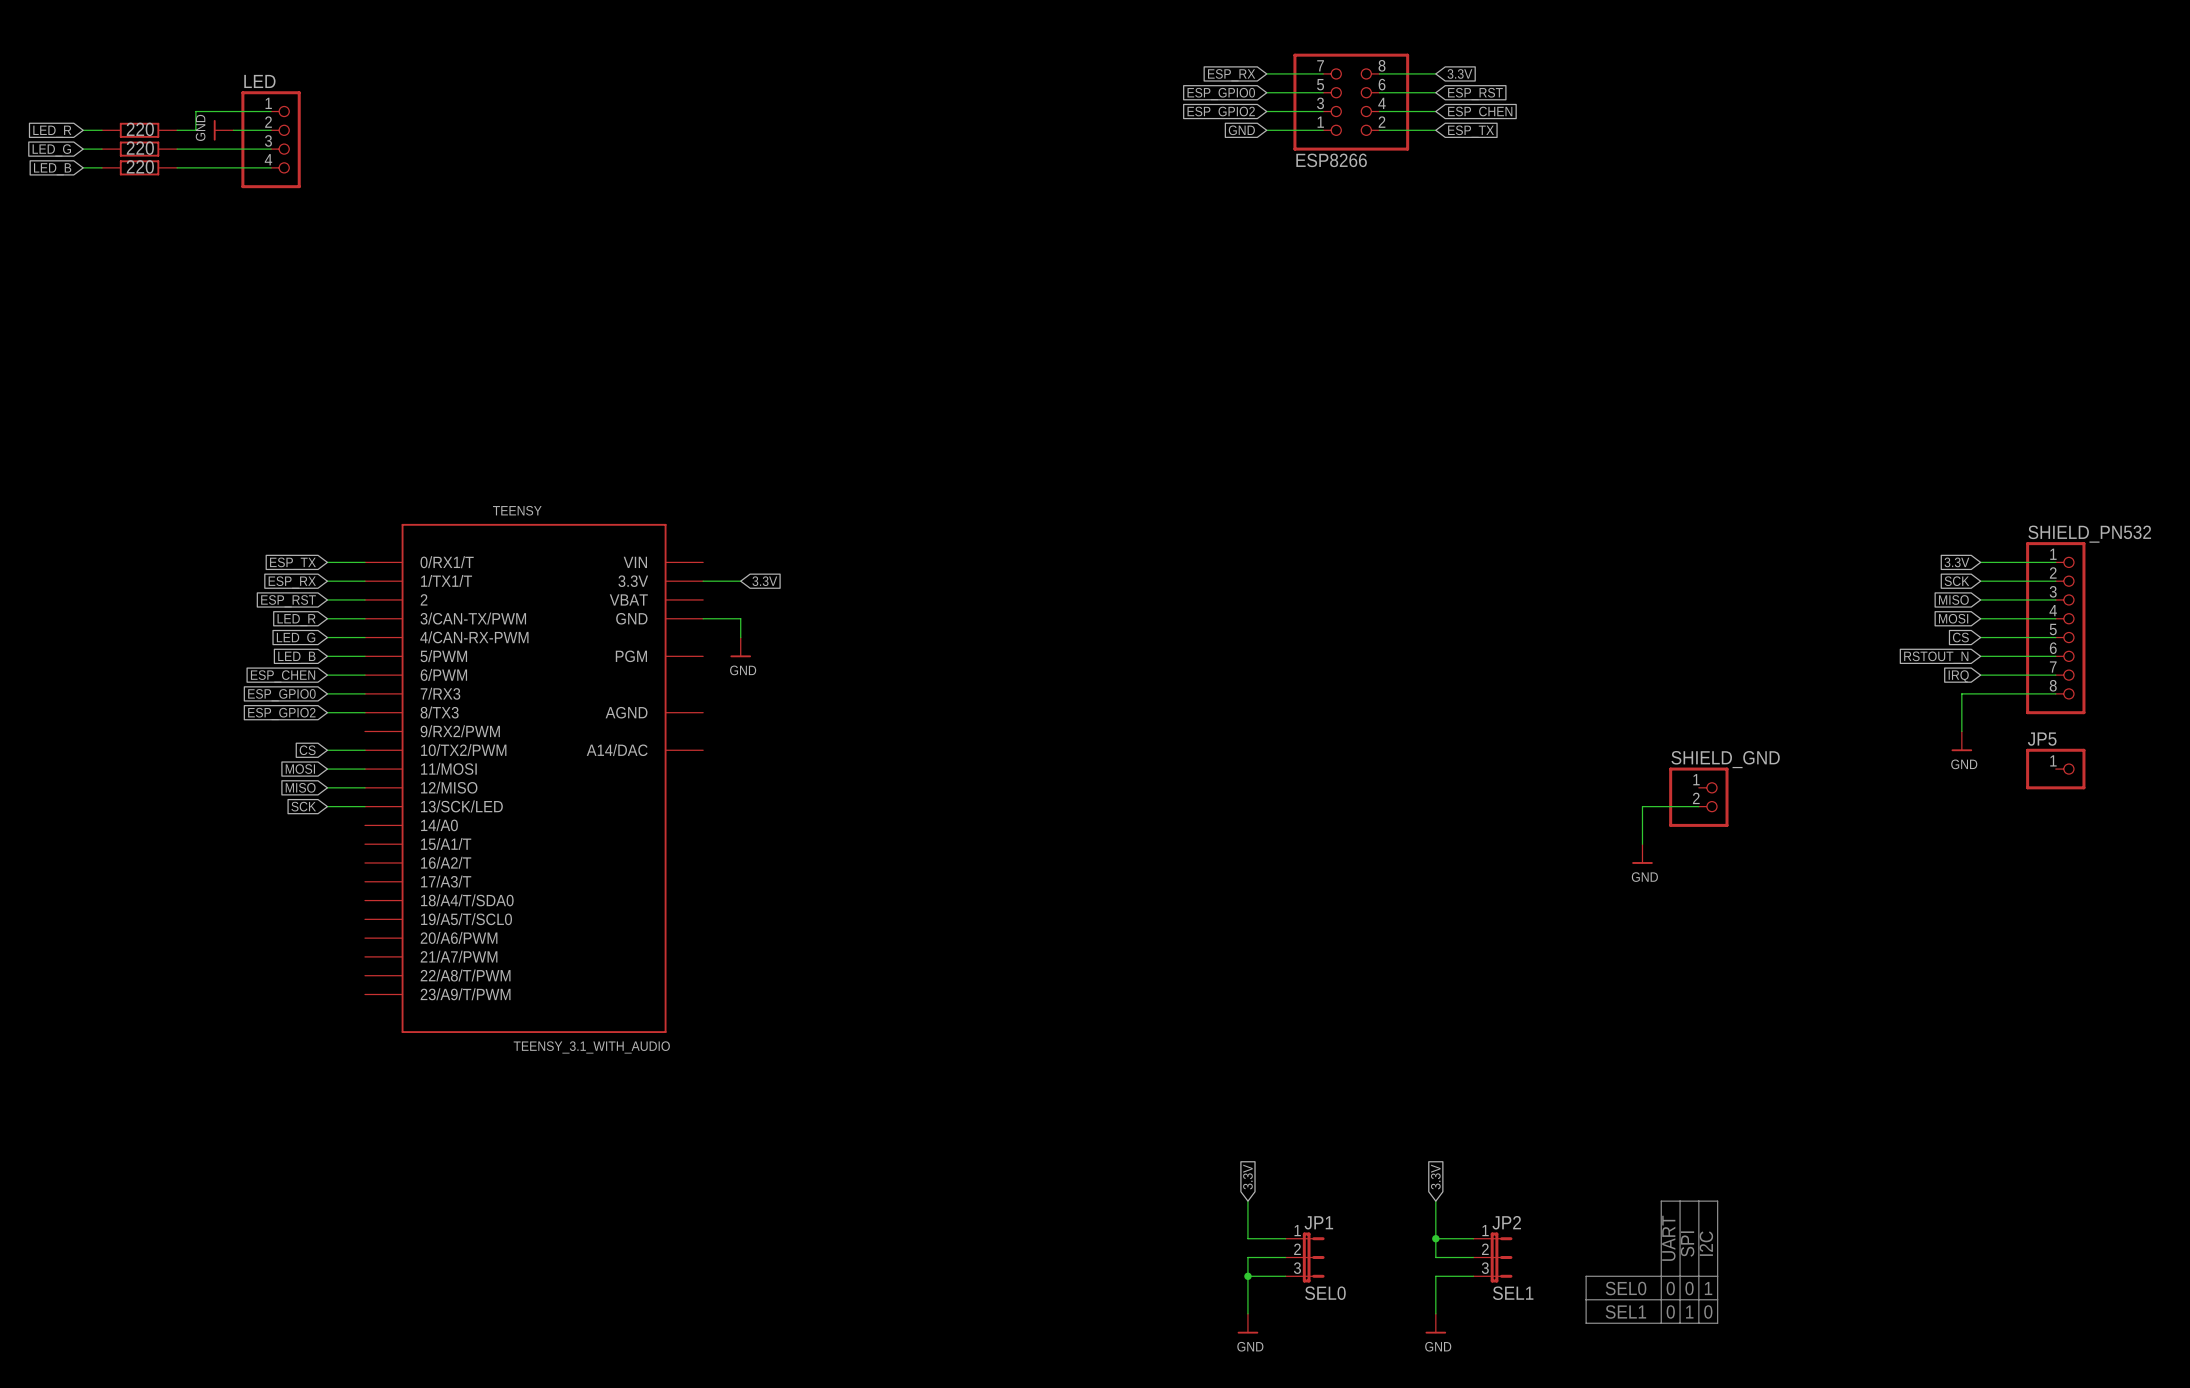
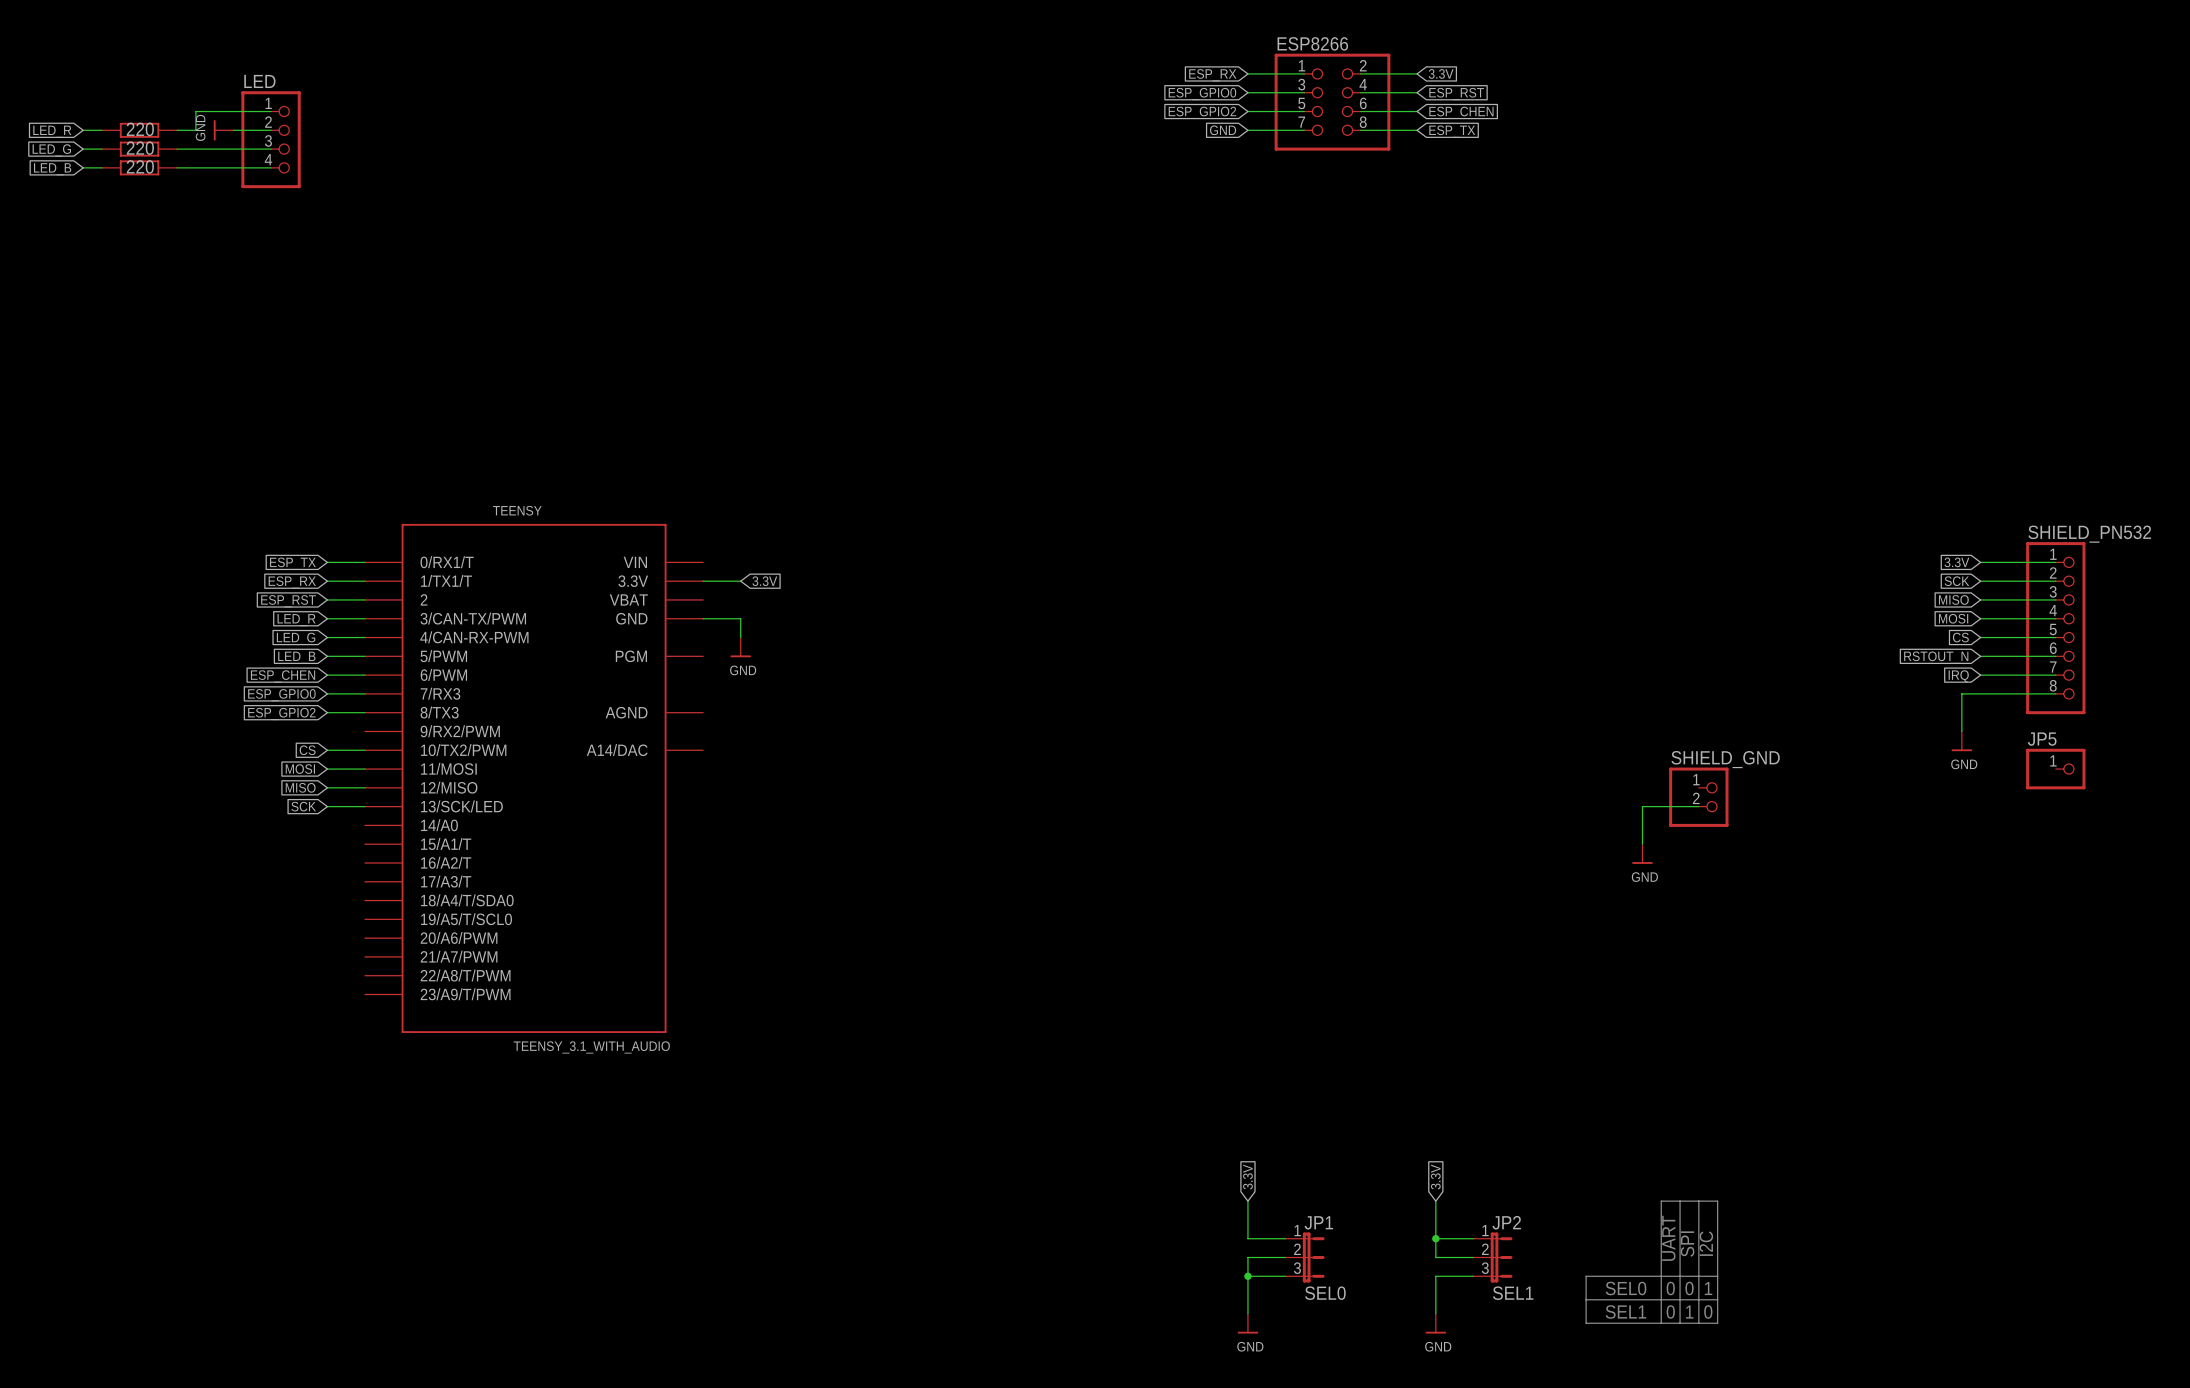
wire: (1304, 73) (1323, 73) -> (1247, 73) (1266, 73)
global label position: 3.3V (1459, 73) -> 3.3V (1441, 73)
global label position: ESP_RX (1231, 75) -> ESP_RX (1212, 75)
wire: (1304, 92) (1323, 92) -> (1247, 92) (1266, 92)
global label position: ESP_GPIO0 (1221, 94) -> ESP_GPIO0 (1202, 94)
global label position: ESP_RST (1475, 94) -> ESP_RST (1456, 94)
ESP8266 flip: as is (1351, 102) -> up-down (1332, 102)
wire: (1304, 111) (1323, 111) -> (1247, 111) (1266, 111)
global label position: ESP_GPIO2 (1221, 112) -> ESP_GPIO2 (1202, 112)
global label position: ESP_CHEN (1480, 112) -> ESP_CHEN (1461, 112)
global label position: GND (1241, 130) -> GND (1223, 130)
wire: (1304, 130) (1323, 130) -> (1247, 130) (1266, 130)
global label position: ESP_TX (1471, 131) -> ESP_TX (1452, 131)

